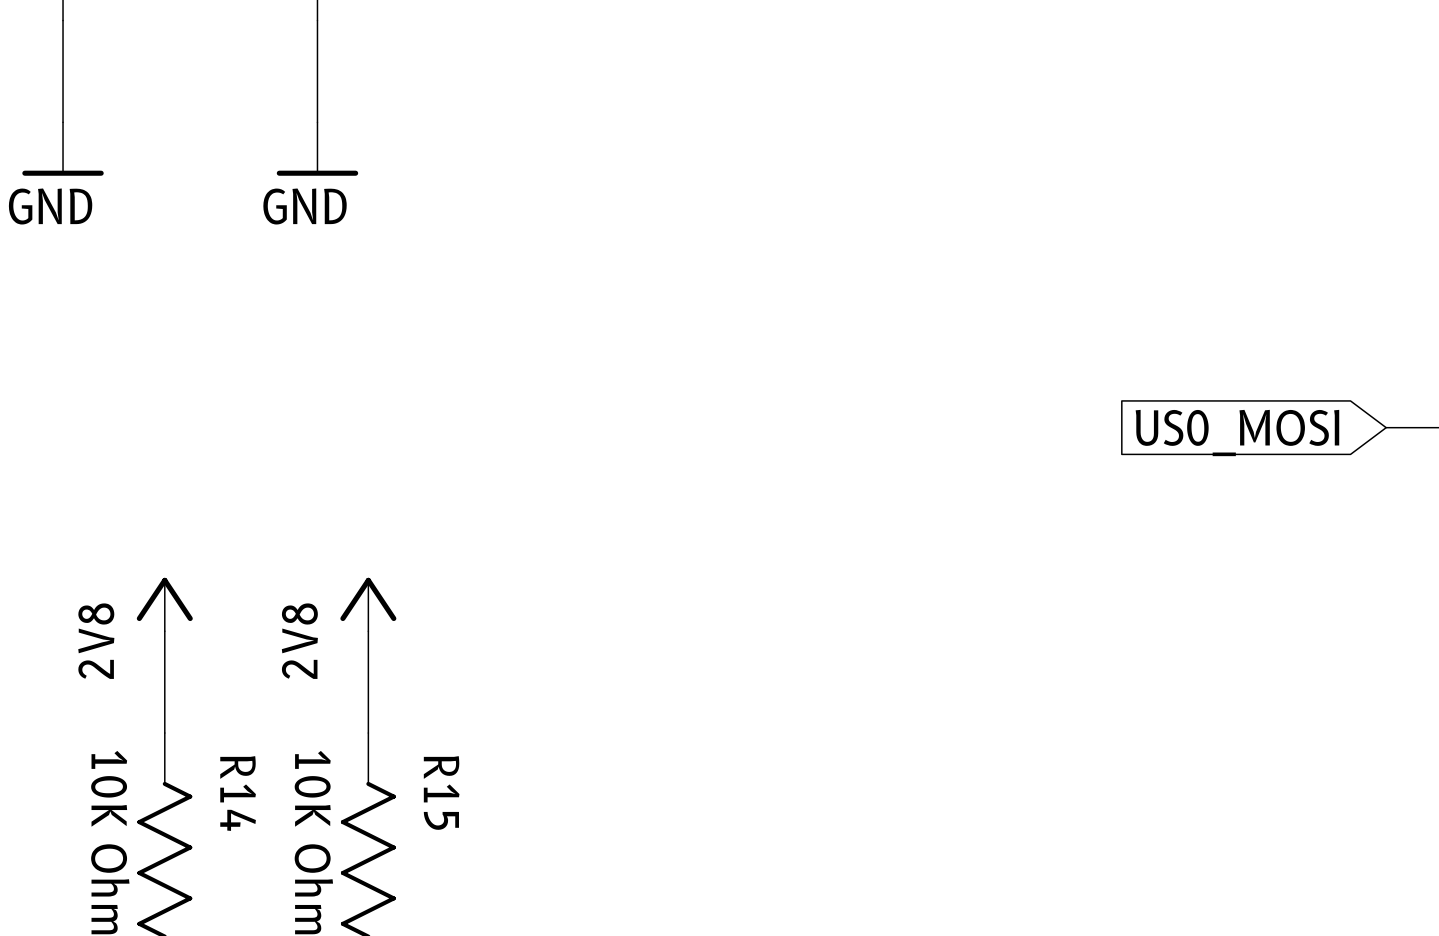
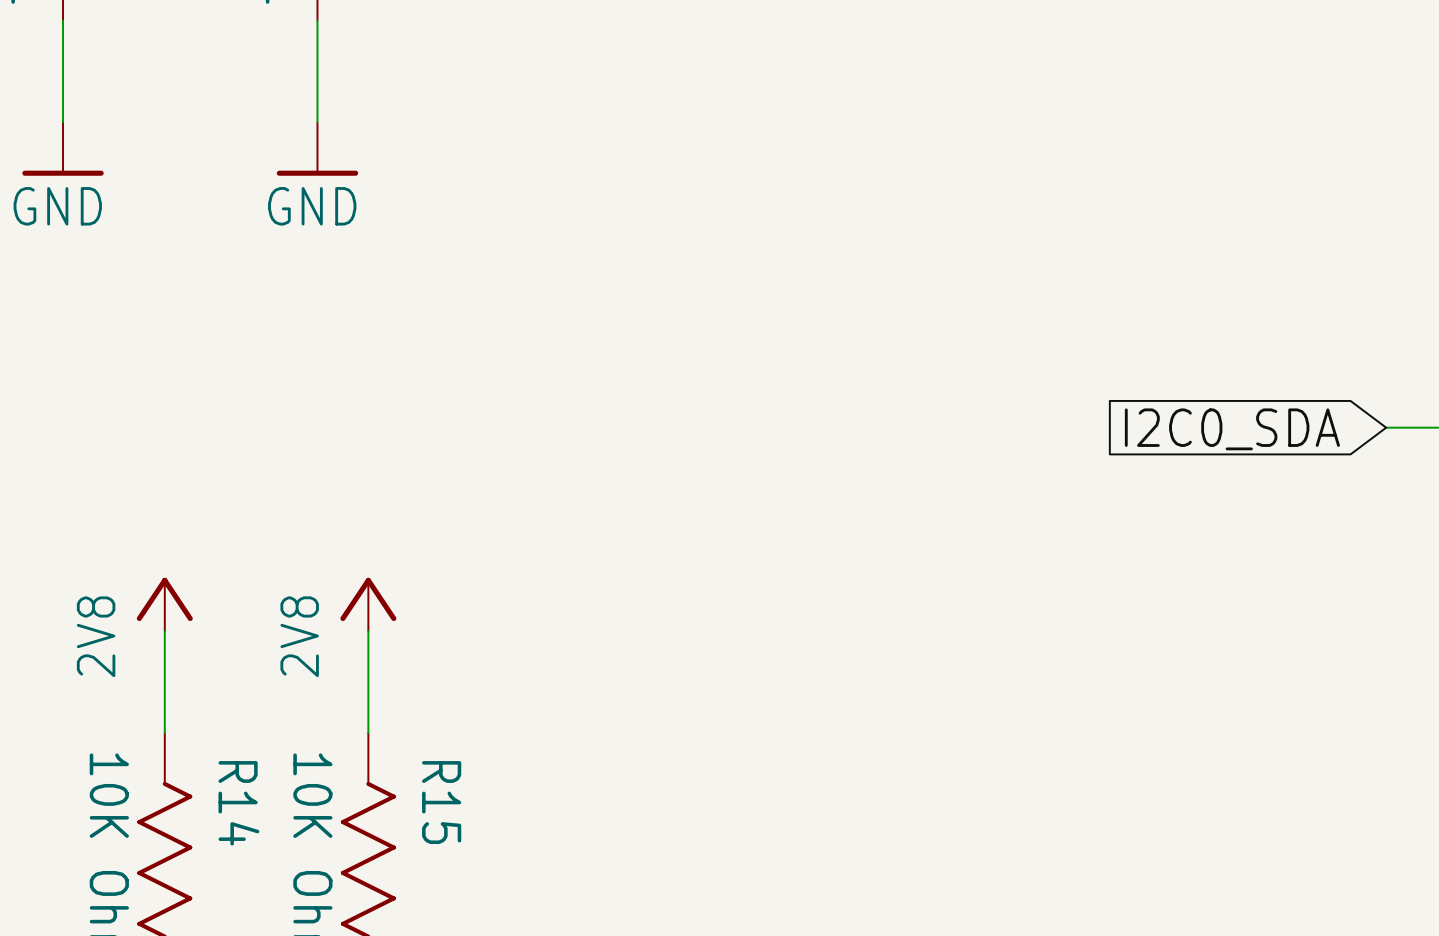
global label: US0_MOSI (1237, 433) -> I2C0_SDA (1232, 429)

